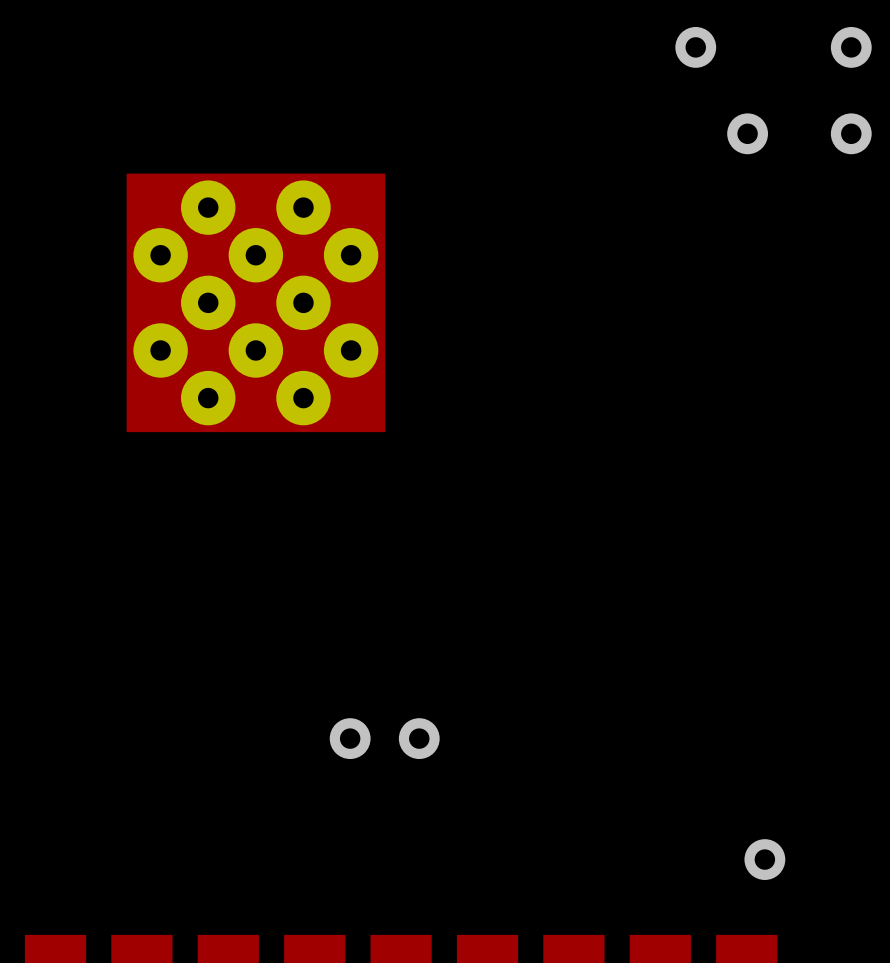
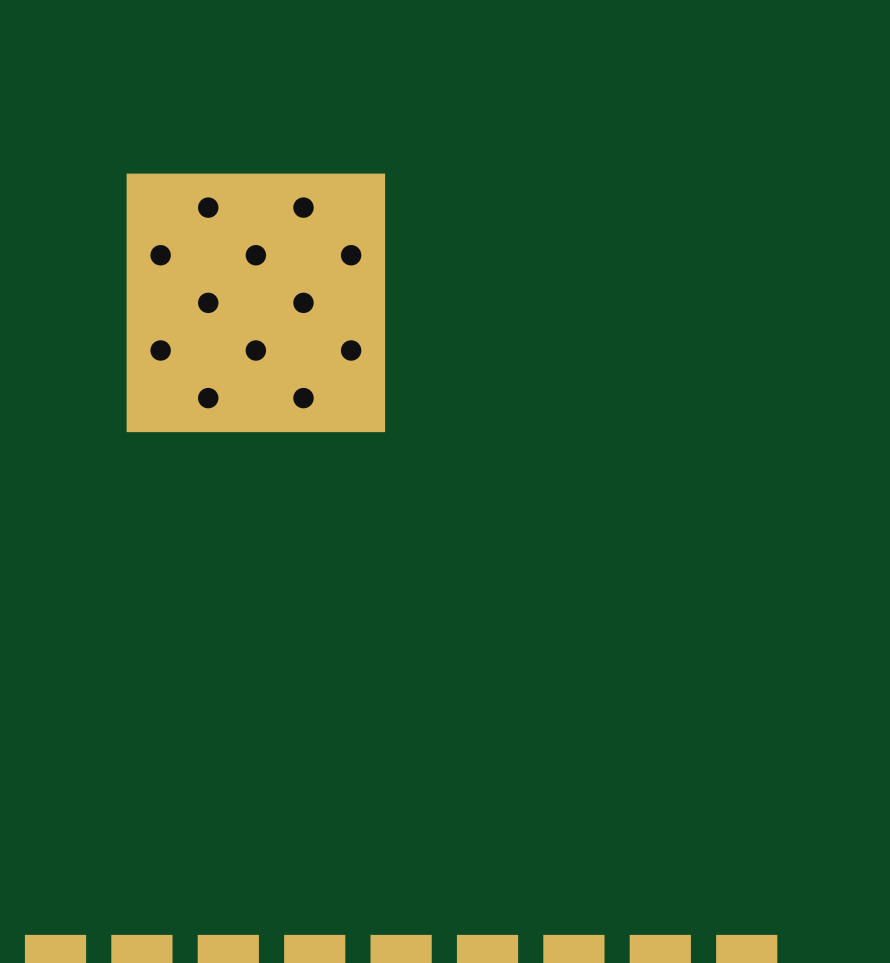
via: (695, 47) -> none
via: (851, 47) -> none
via: (747, 133) -> none
via: (851, 133) -> none
via: (350, 738) -> none
via: (419, 738) -> none
via: (764, 859) -> none

